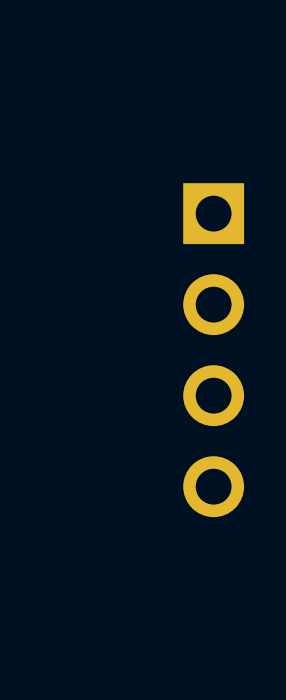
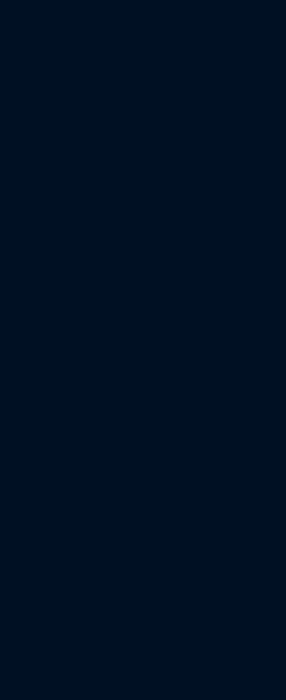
part: (213, 350) -> none

